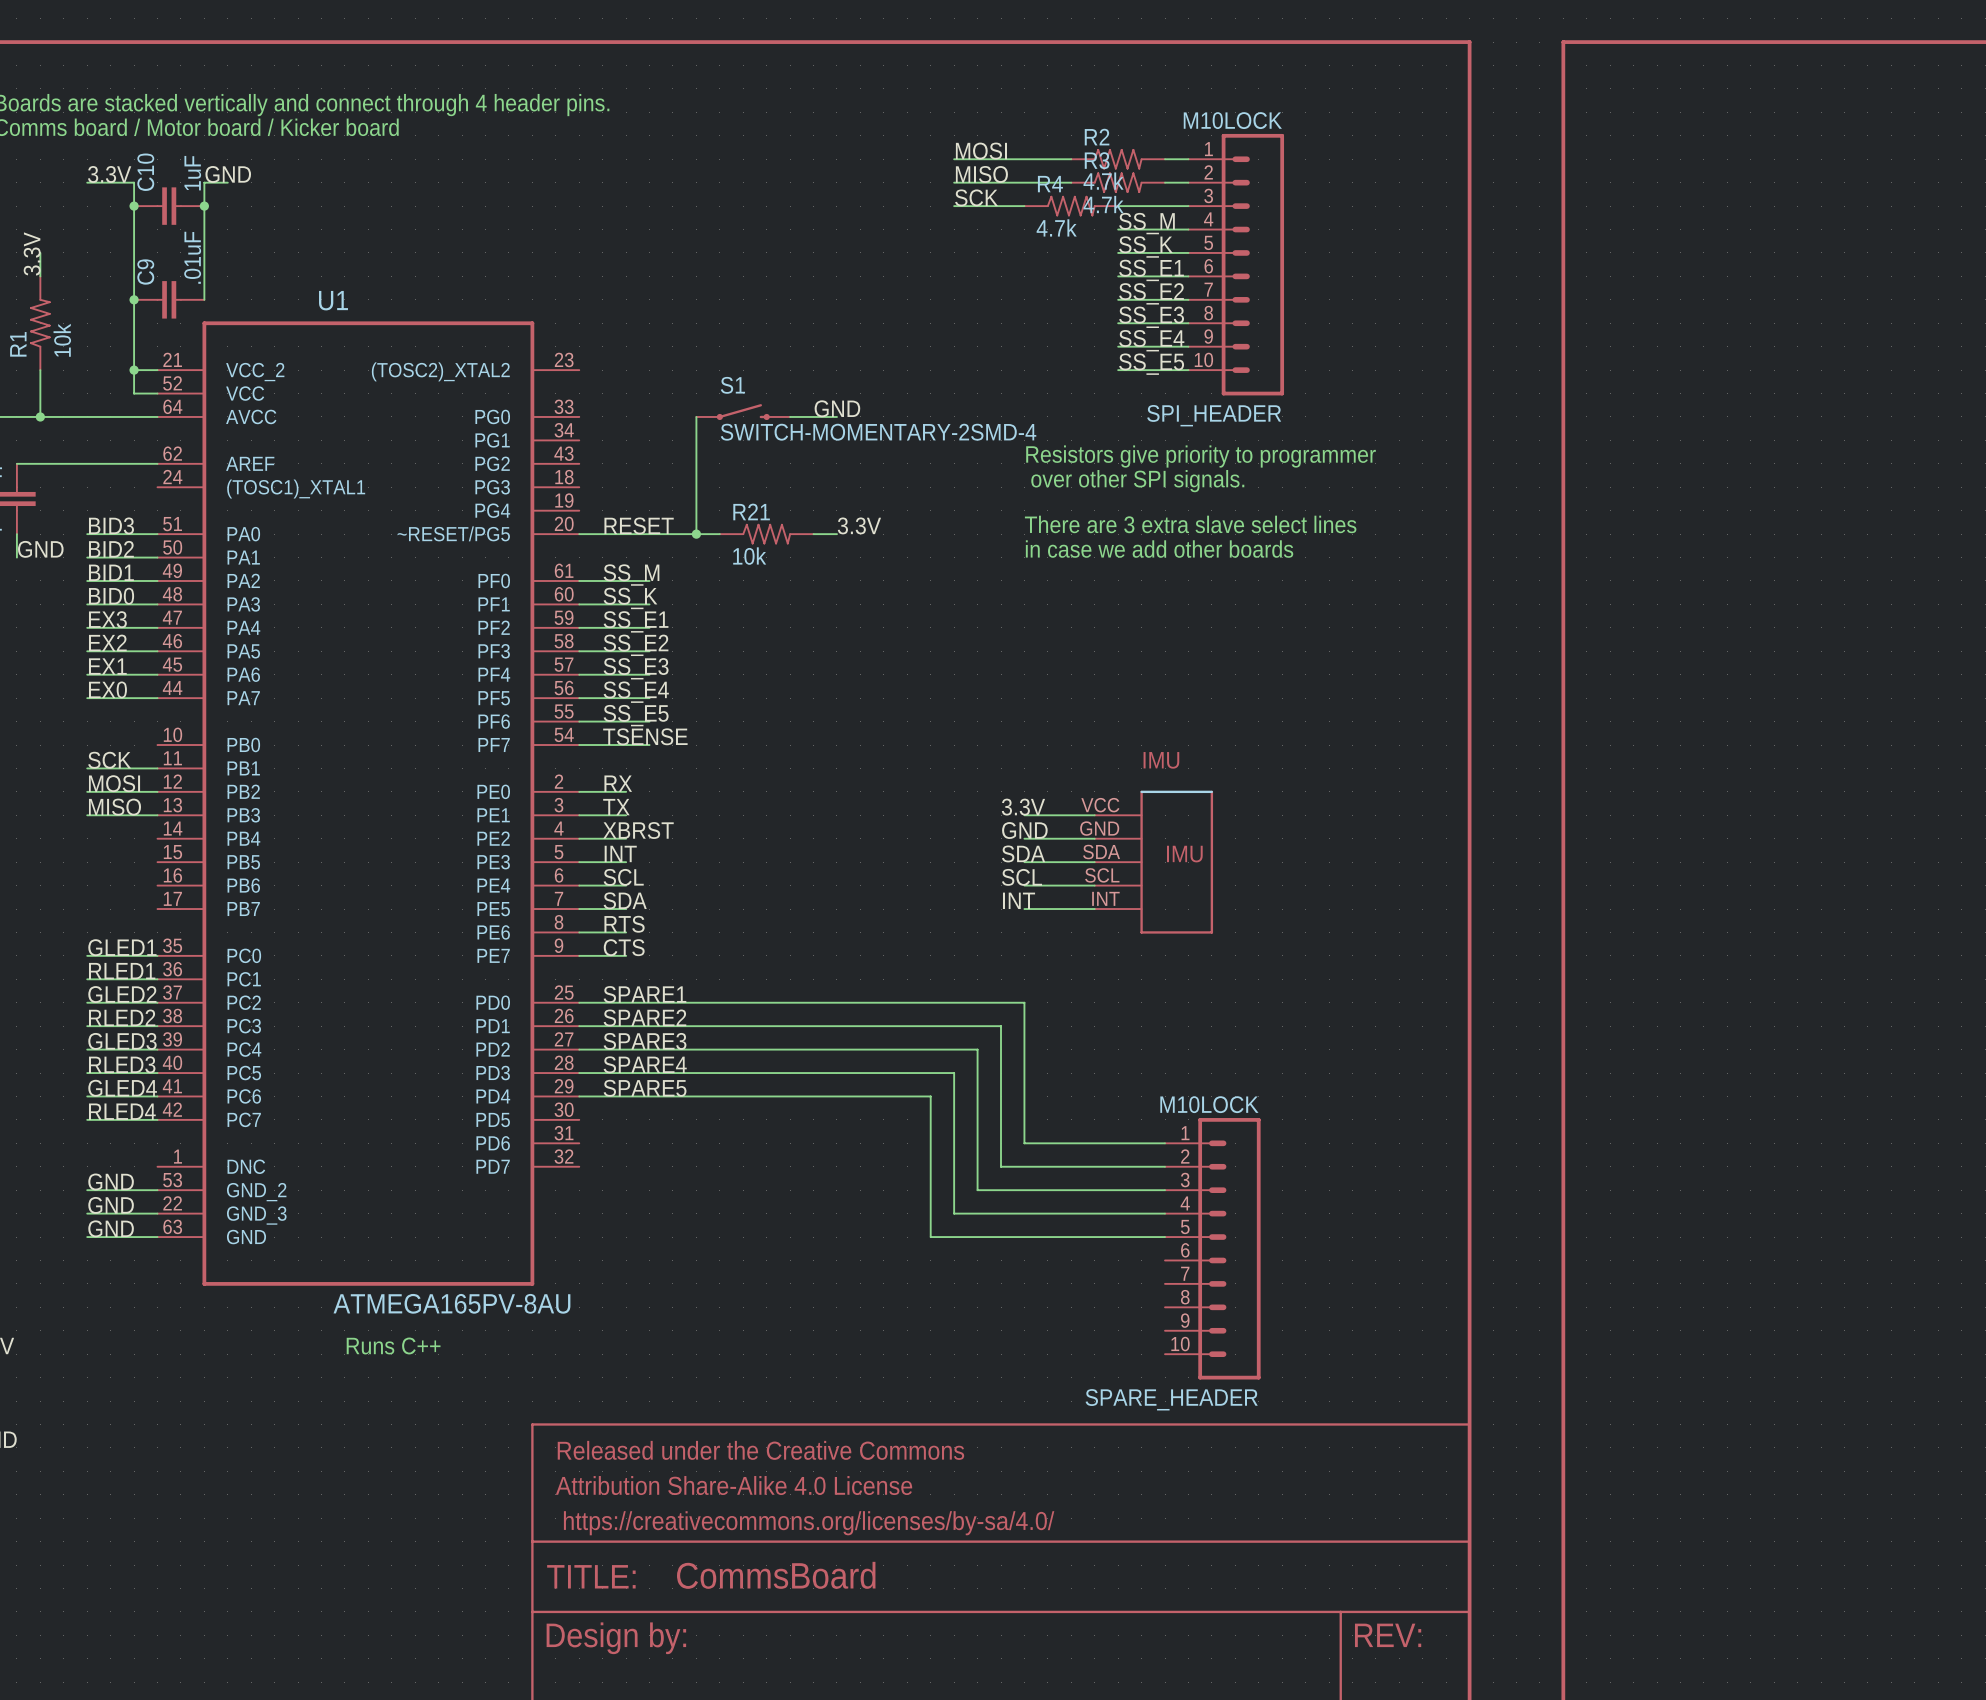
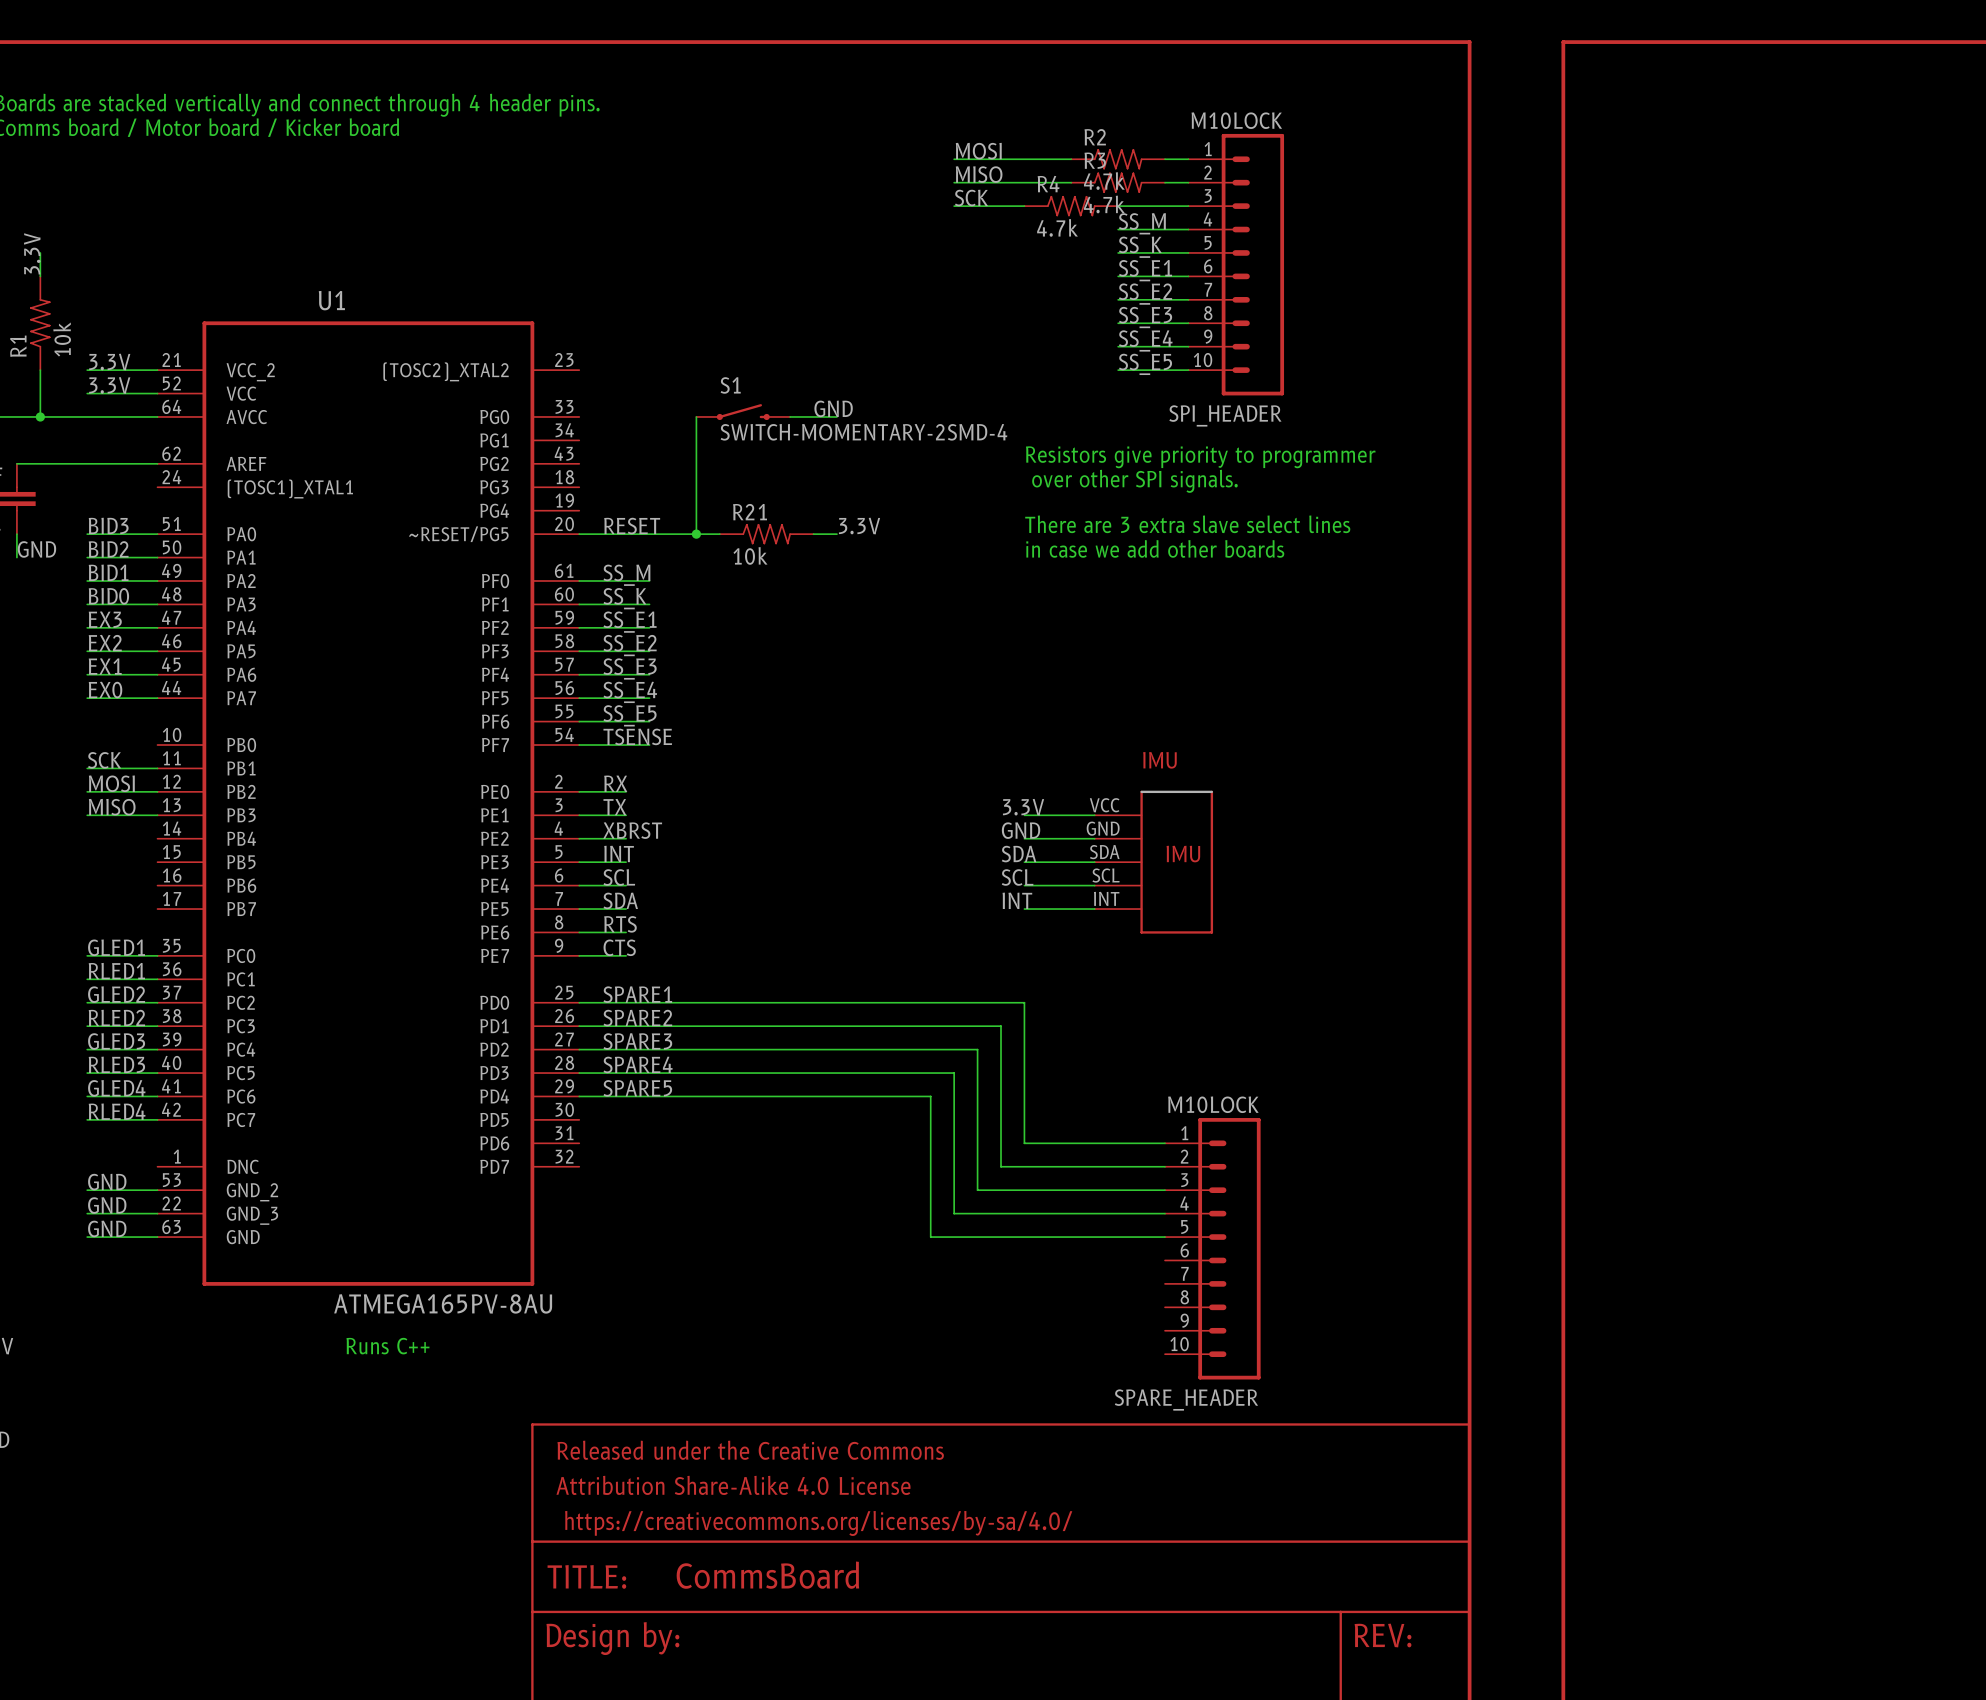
label: 3.3V (109, 174) -> none
label: GND (228, 174) -> none
wire: (87, 182) (134, 182) (134, 393) -> (87, 393) (134, 393)
wire: (227, 182) (204, 182) (204, 299) -> none
junction: (134, 206) -> none
C10: 1uF (169, 206) -> none
junction: (204, 206) -> none
junction: (134, 299) -> none
C9: .01uF (169, 299) -> none
label: none -> 3.3V (109, 362)
wire: none -> (87, 370) (134, 370)
junction: (134, 370) -> none
label: none -> 3.3V (109, 385)

